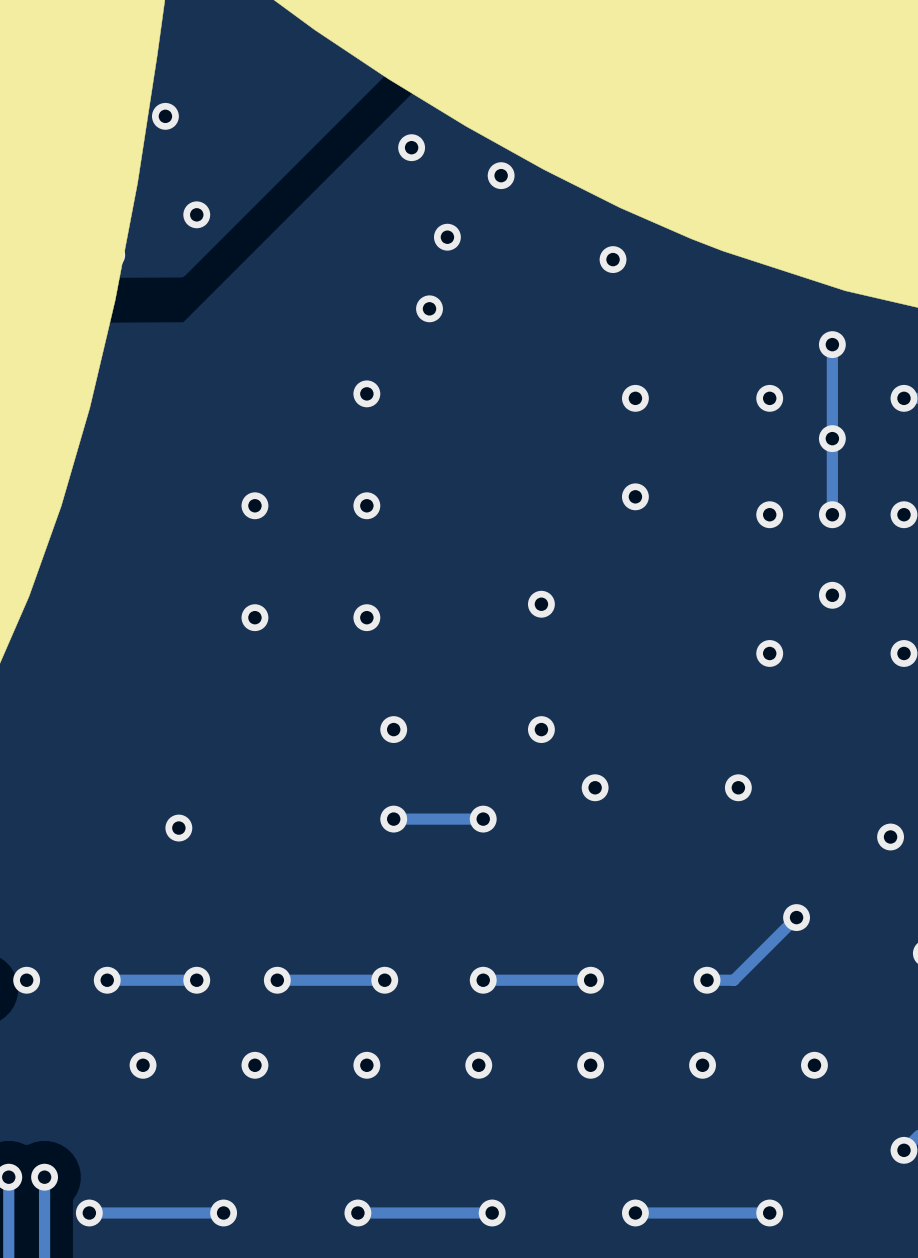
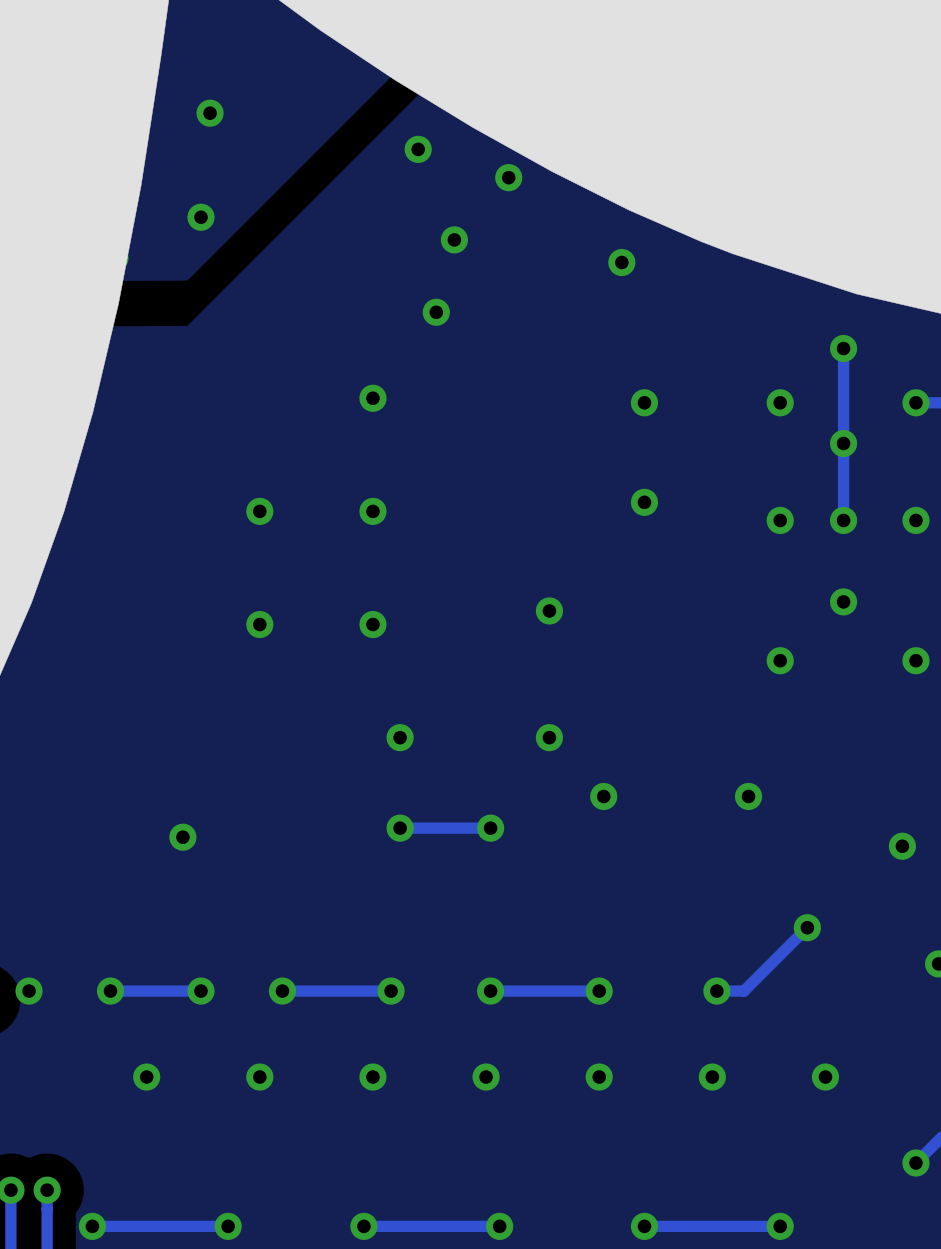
via position: (165, 116) -> (210, 113)

